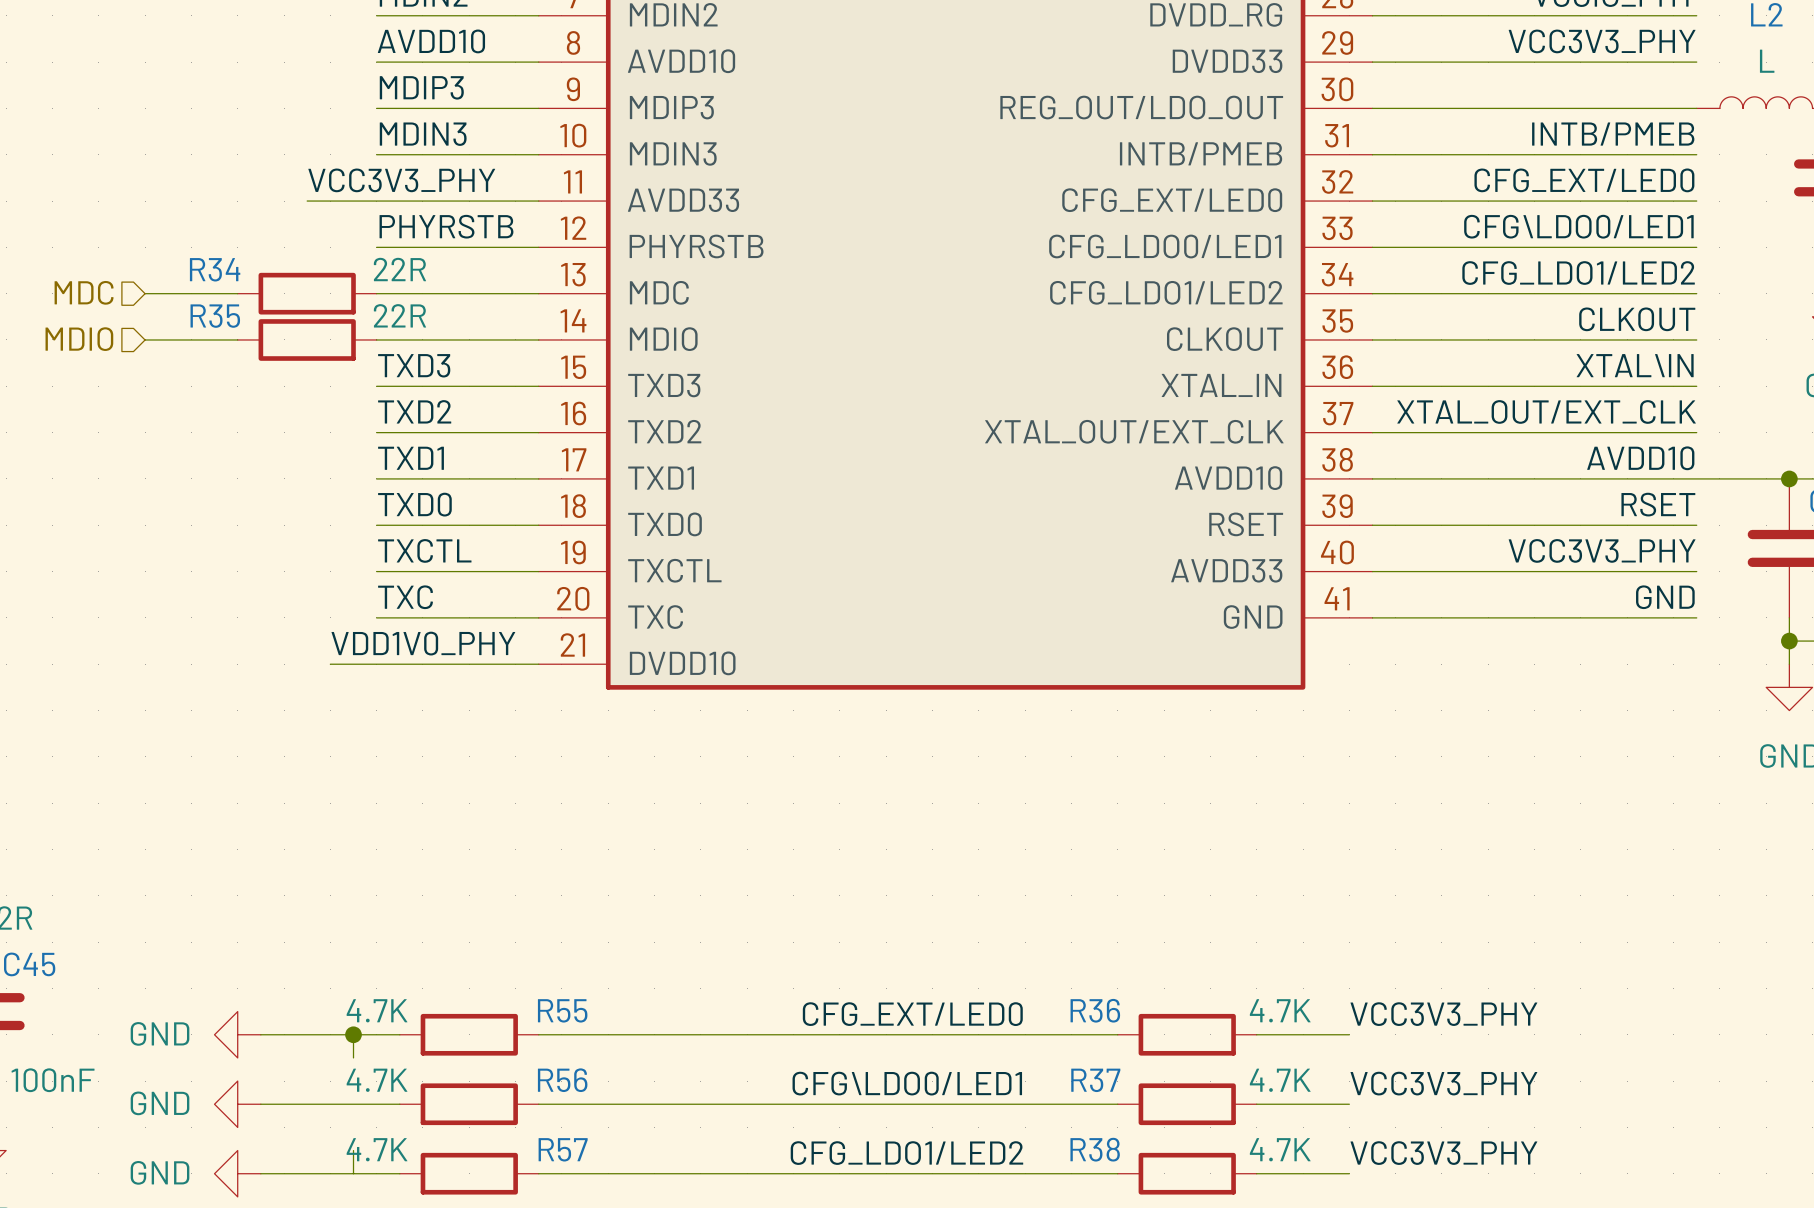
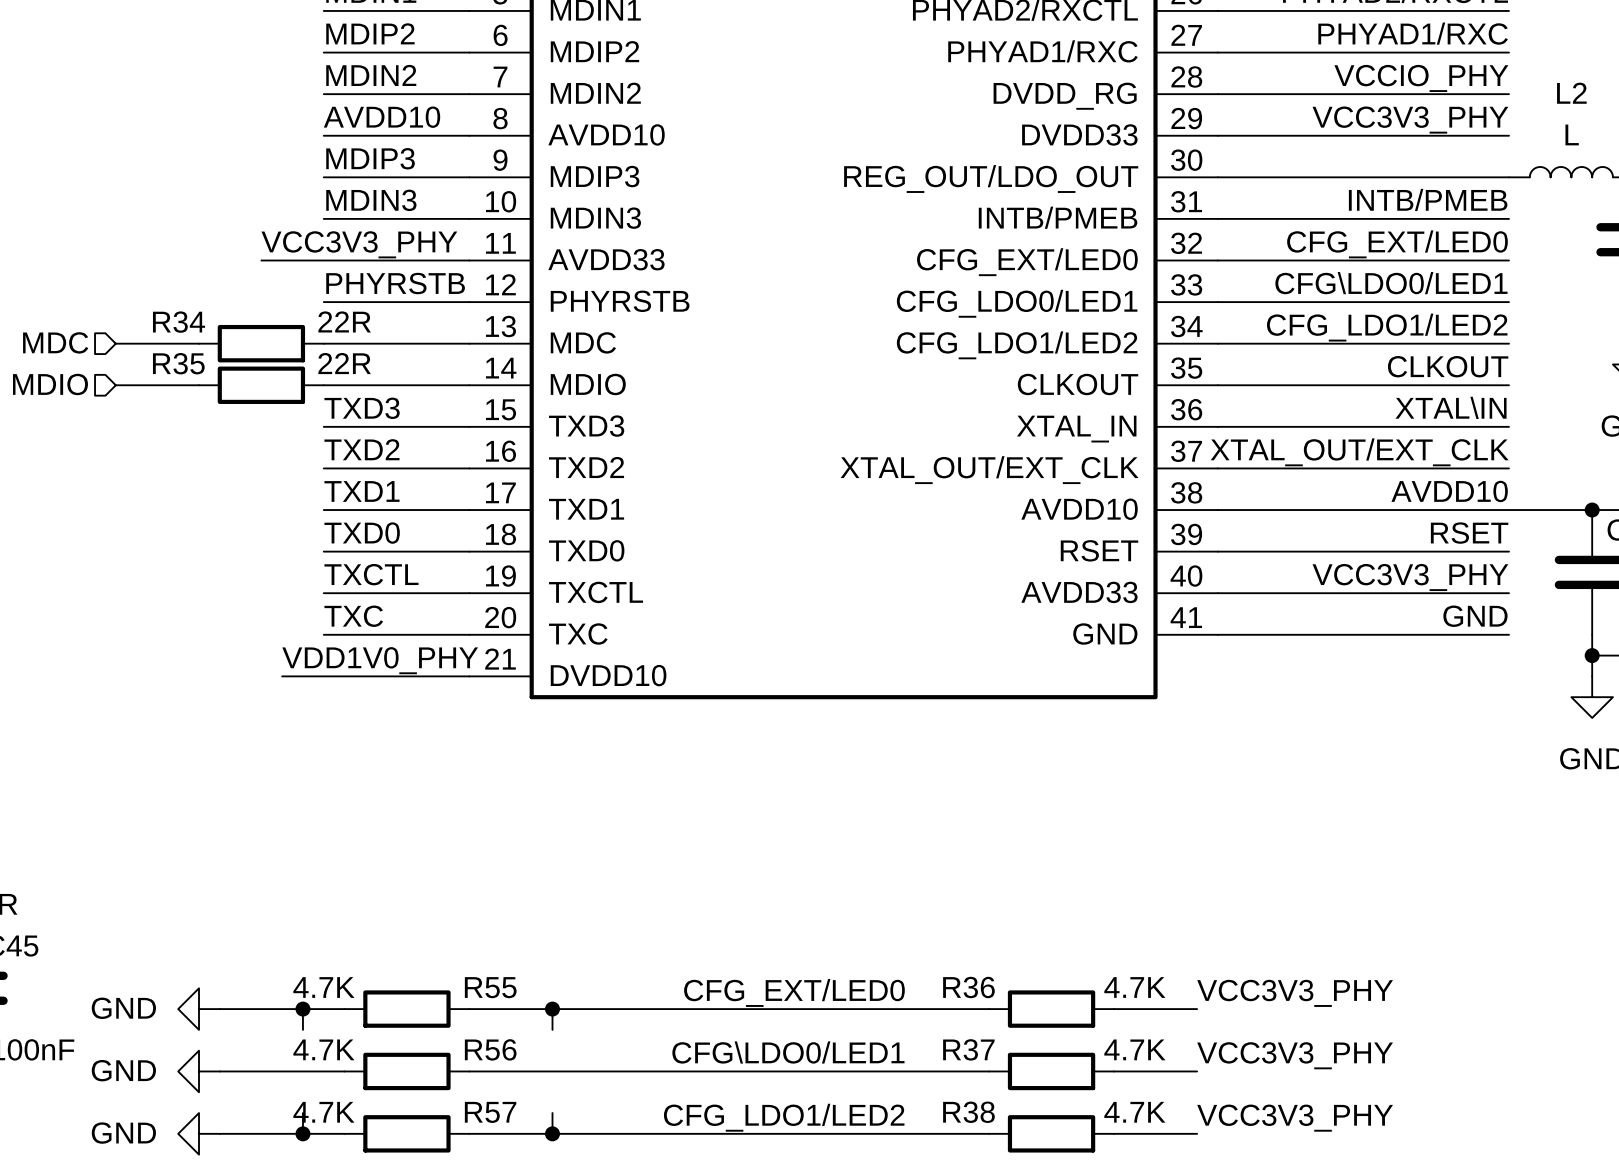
wire: none -> (552, 1009) (552, 1029)
junction: none -> (552, 1009)
wire: none -> (552, 1113) (552, 1133)
junction: none -> (302, 1133)
junction: none -> (552, 1133)

